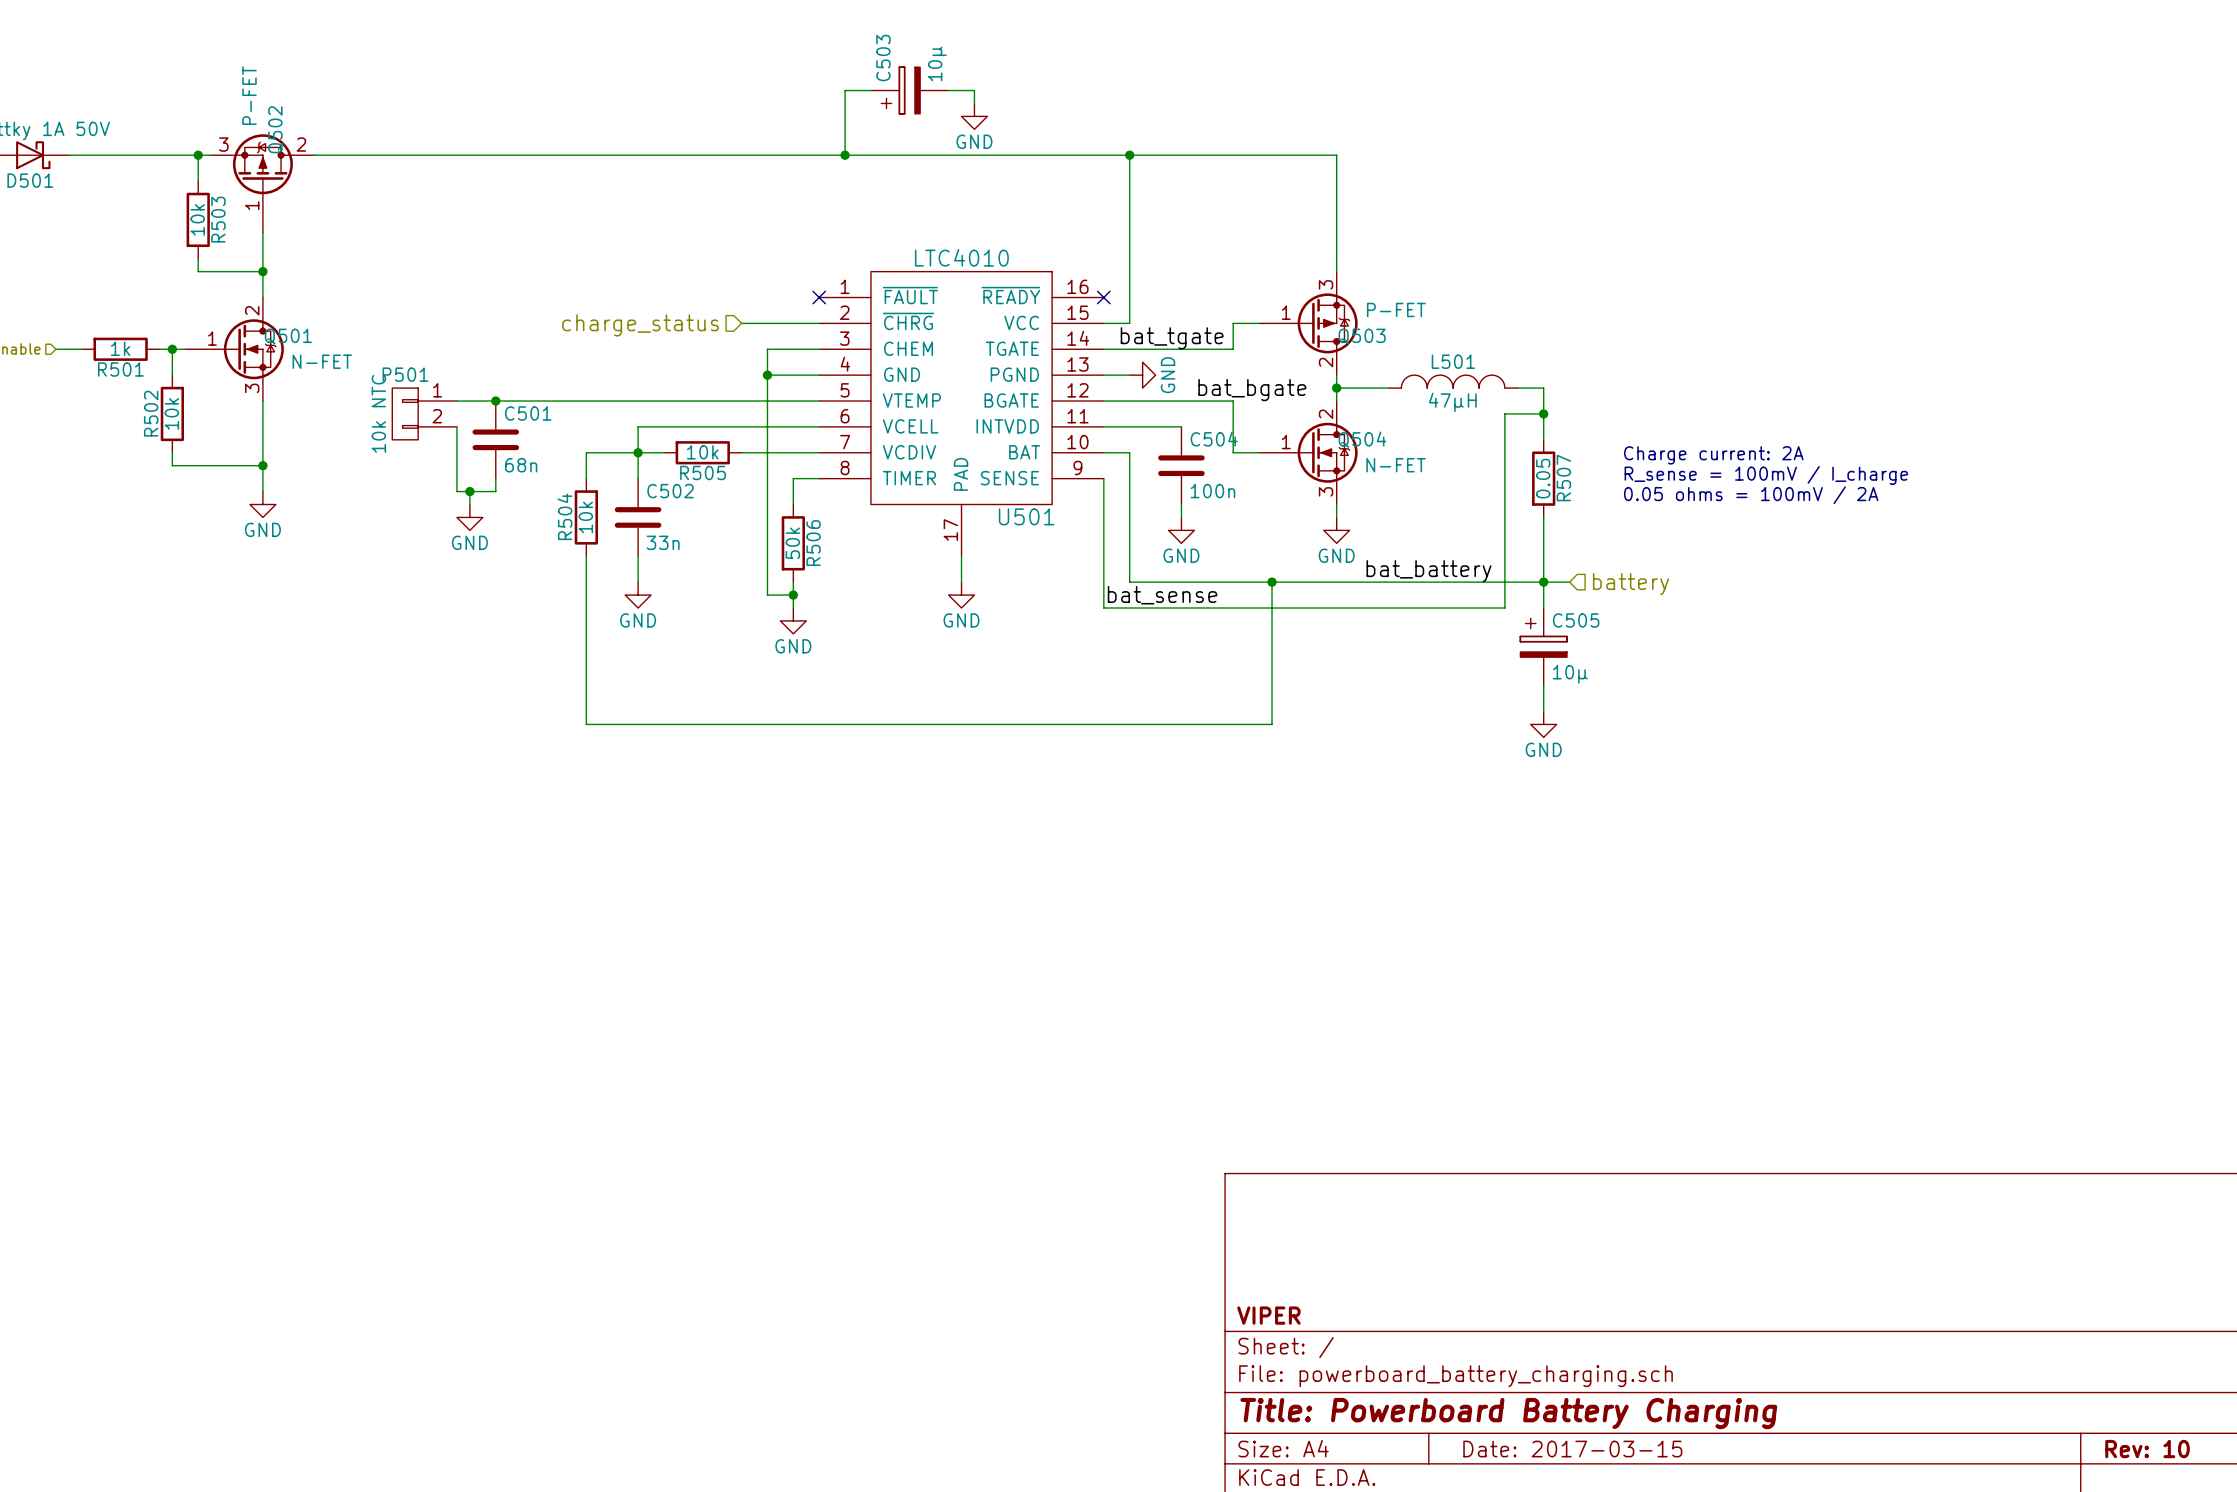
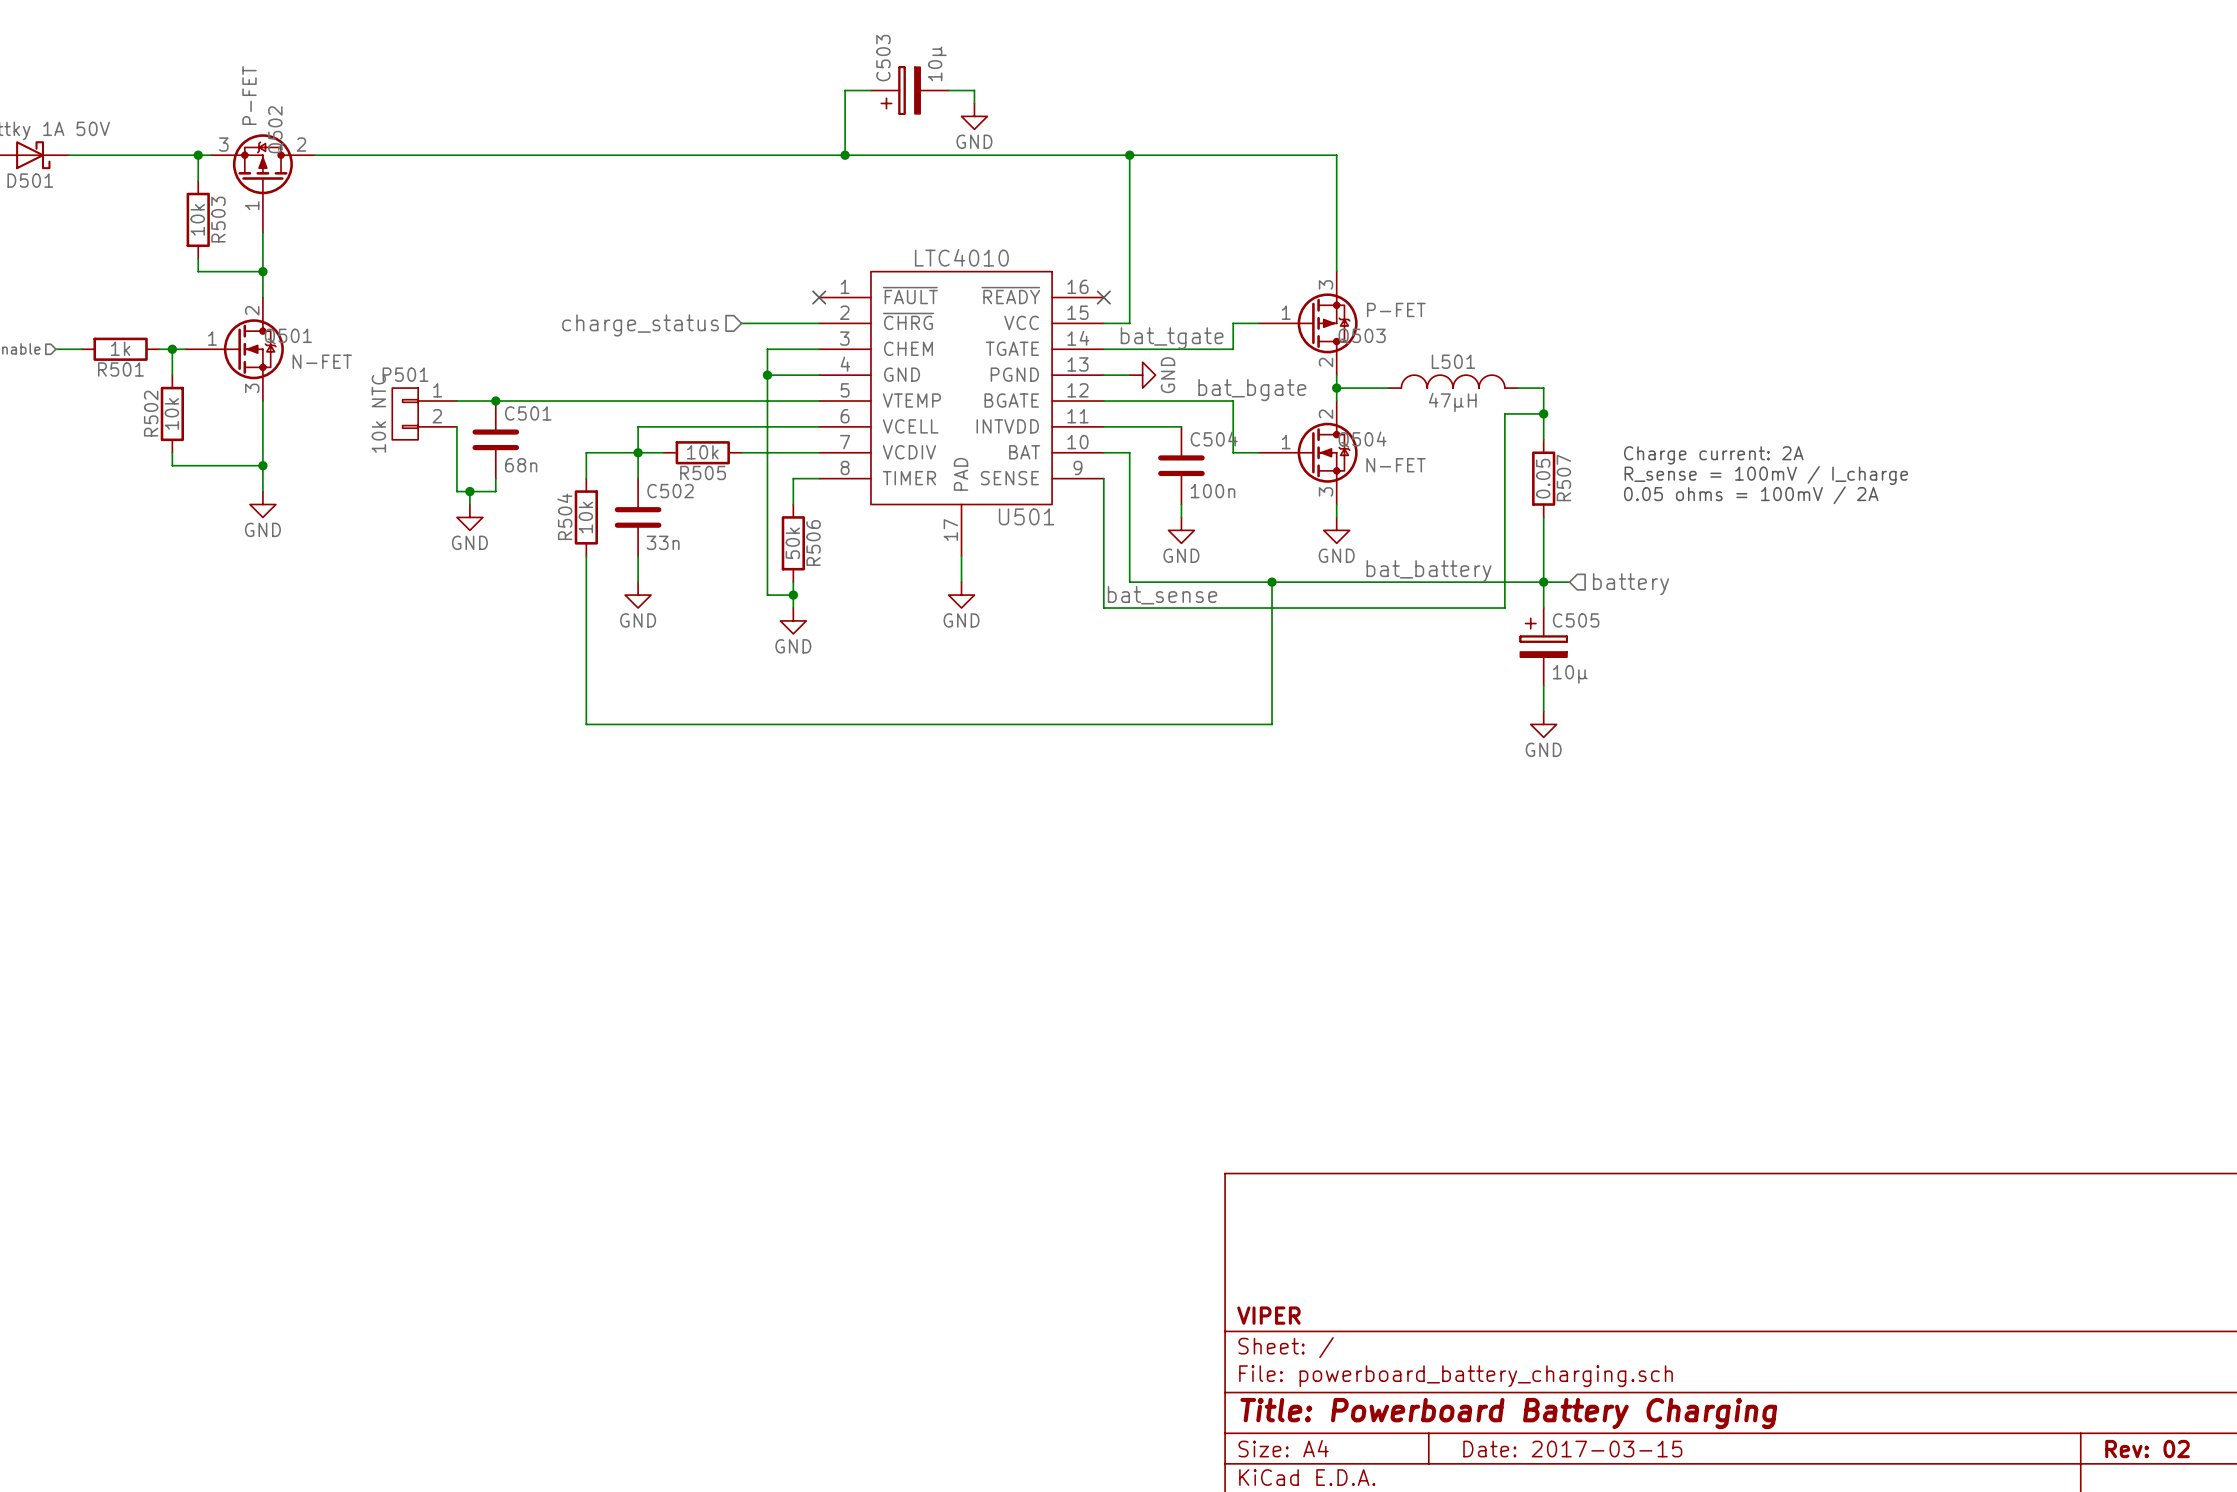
title block: Rev: 10 (2147, 1449) -> Rev: 02 (2147, 1449)

